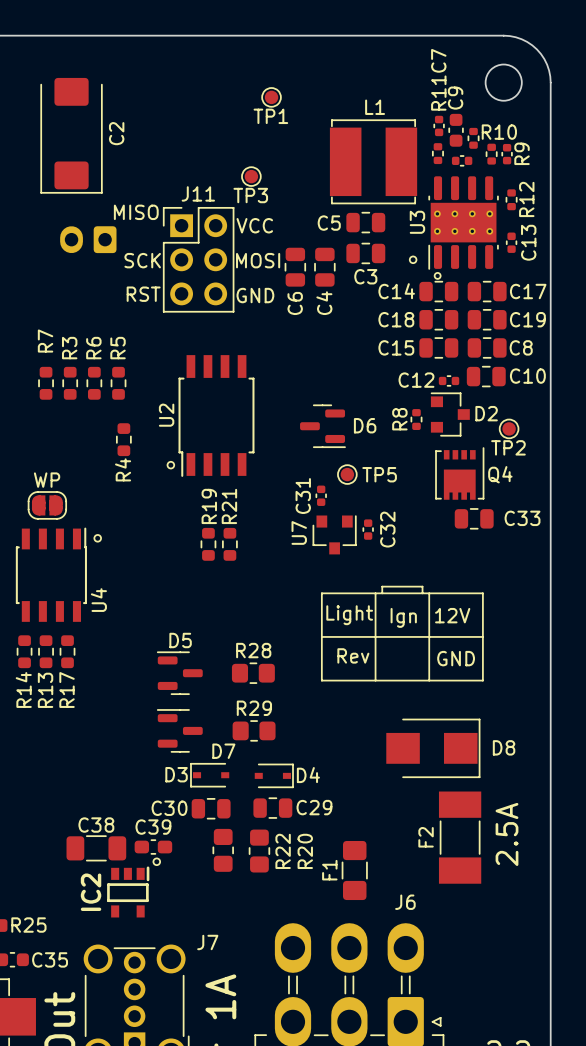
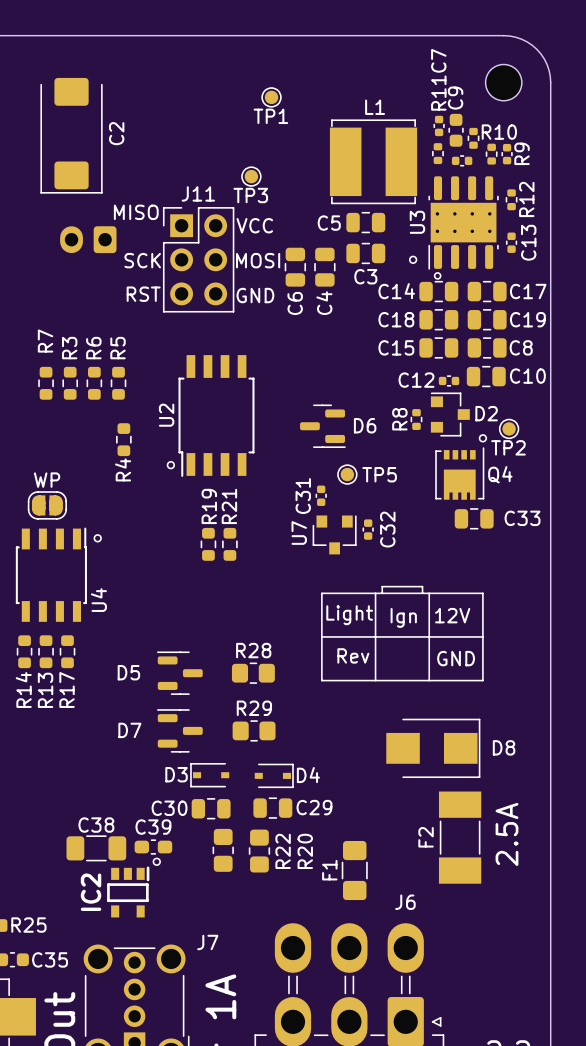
drawing: none -> [478, 434, 488, 443]
D5 name position: D5 (180, 640) -> D5 (128, 672)
D7 name position: D7 (223, 751) -> D7 (129, 730)

